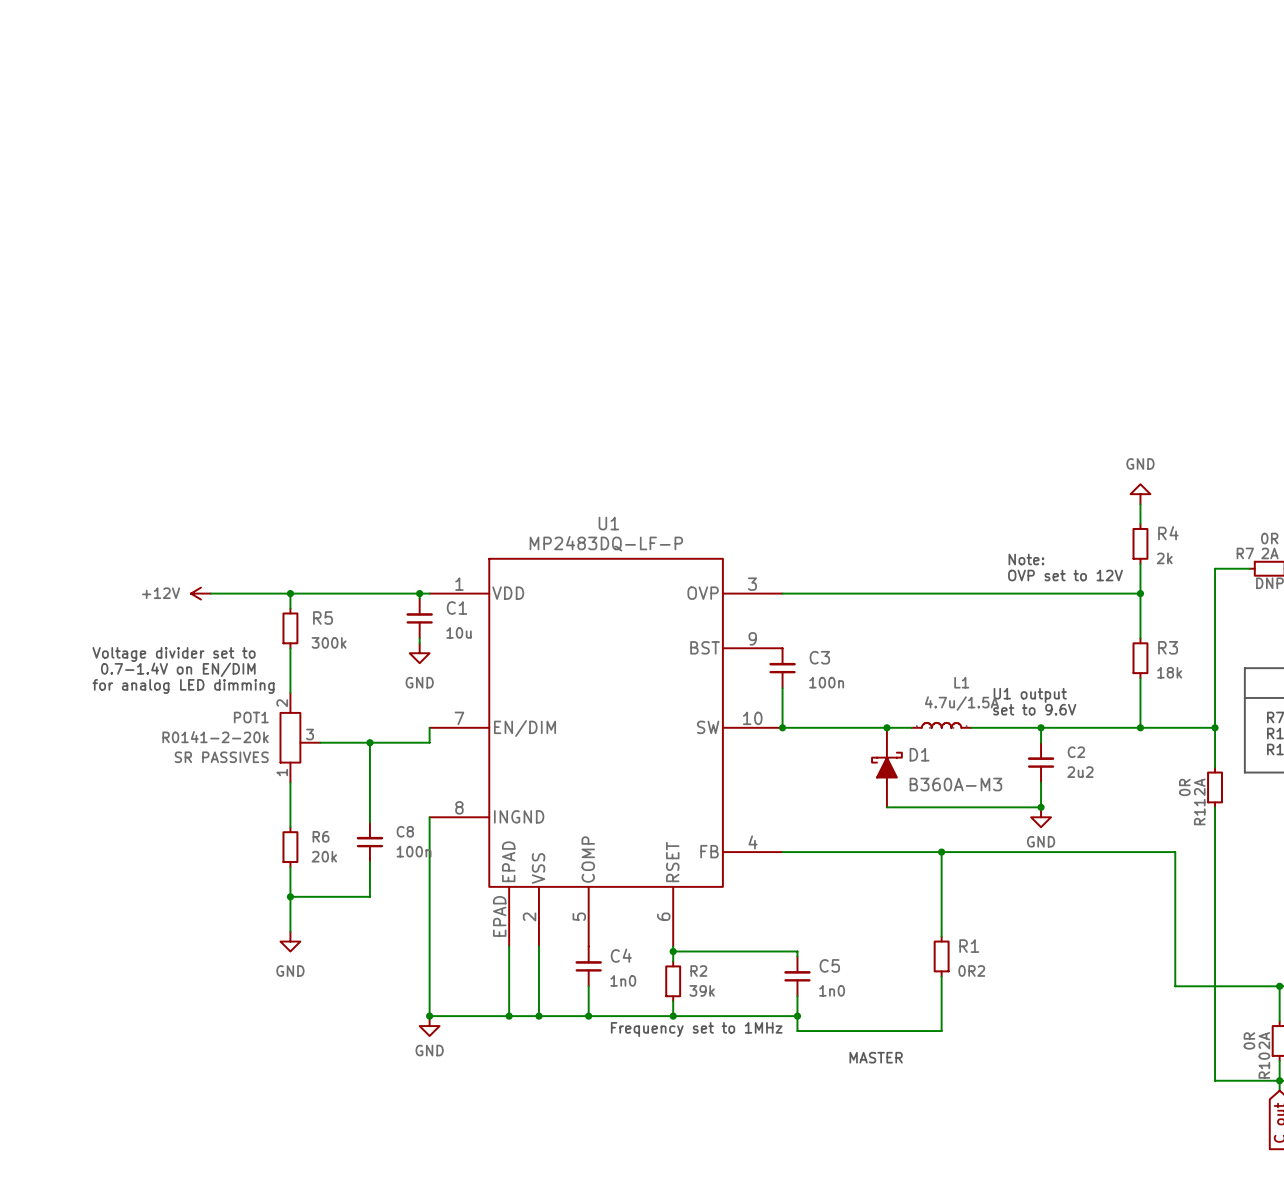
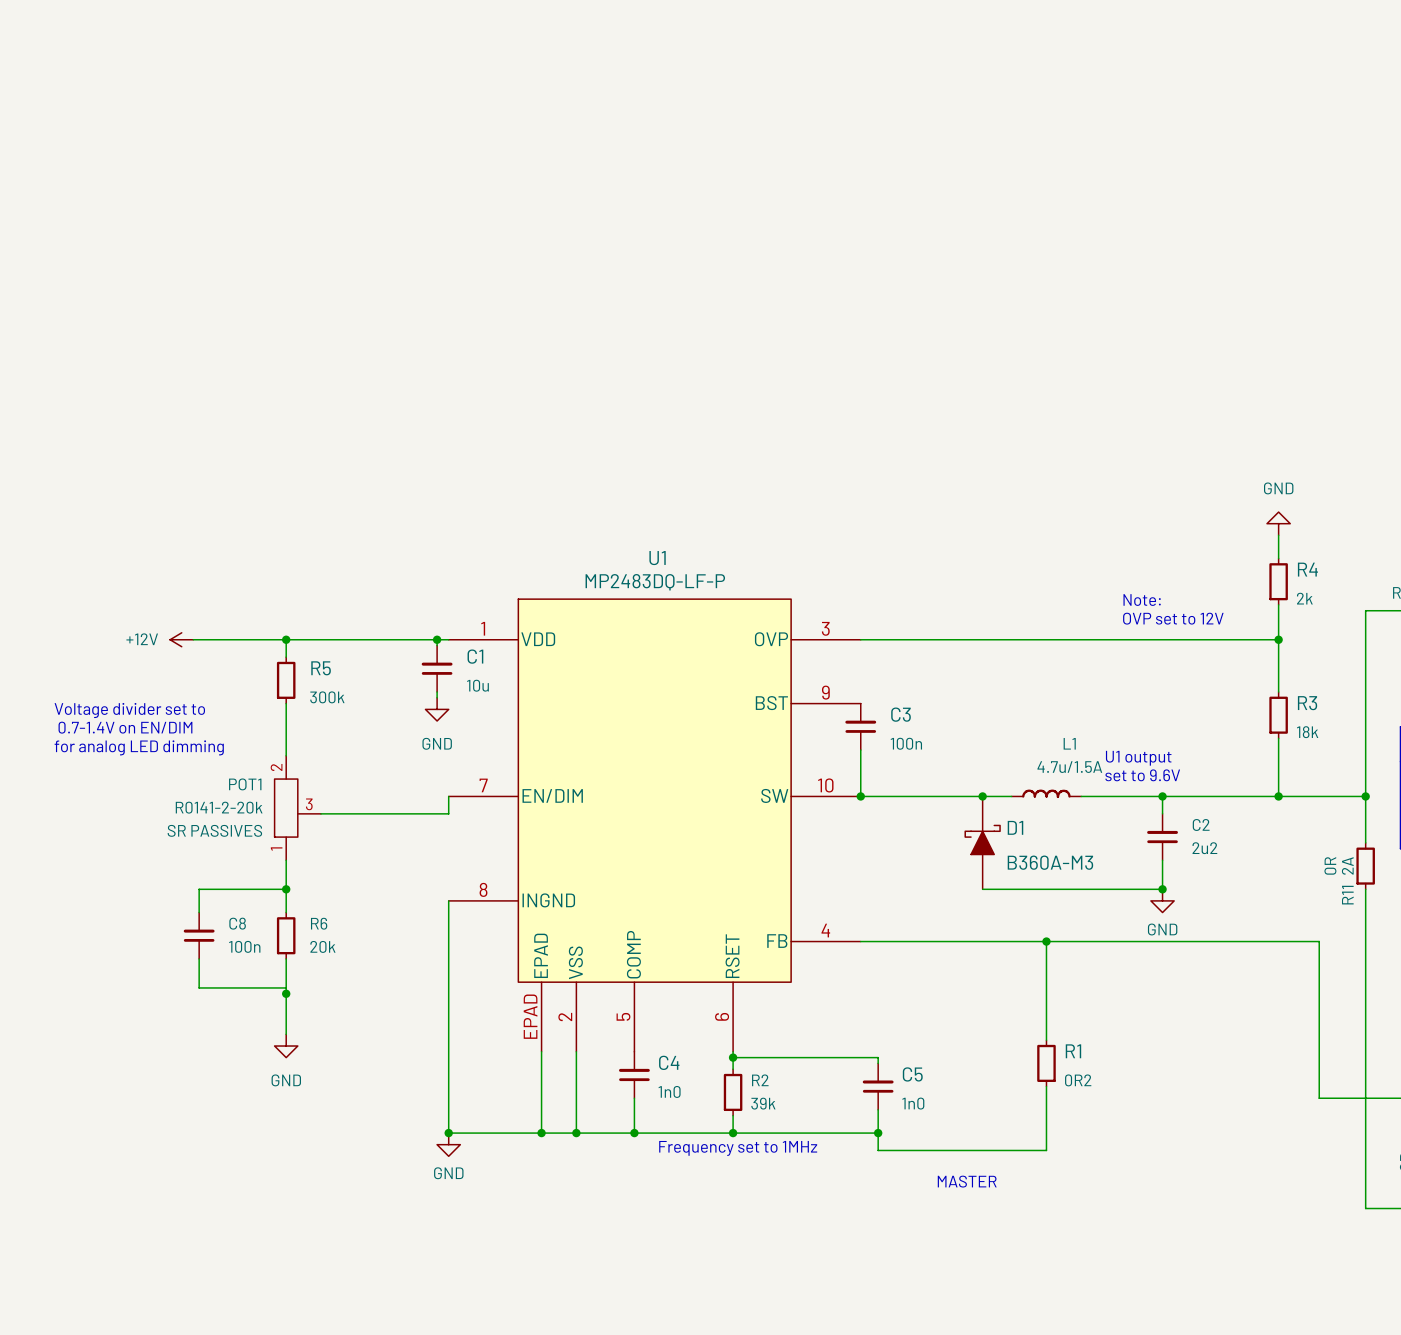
wire: (369, 742) (369, 822) -> none
junction: (369, 742) -> none
wire: none -> (286, 889) (199, 889) (199, 912)
junction: none -> (286, 889)
C8 position: (369, 842) -> (199, 935)
wire: (369, 862) (369, 896) (290, 896) -> none
wire: none -> (199, 958) (199, 987) (286, 987)

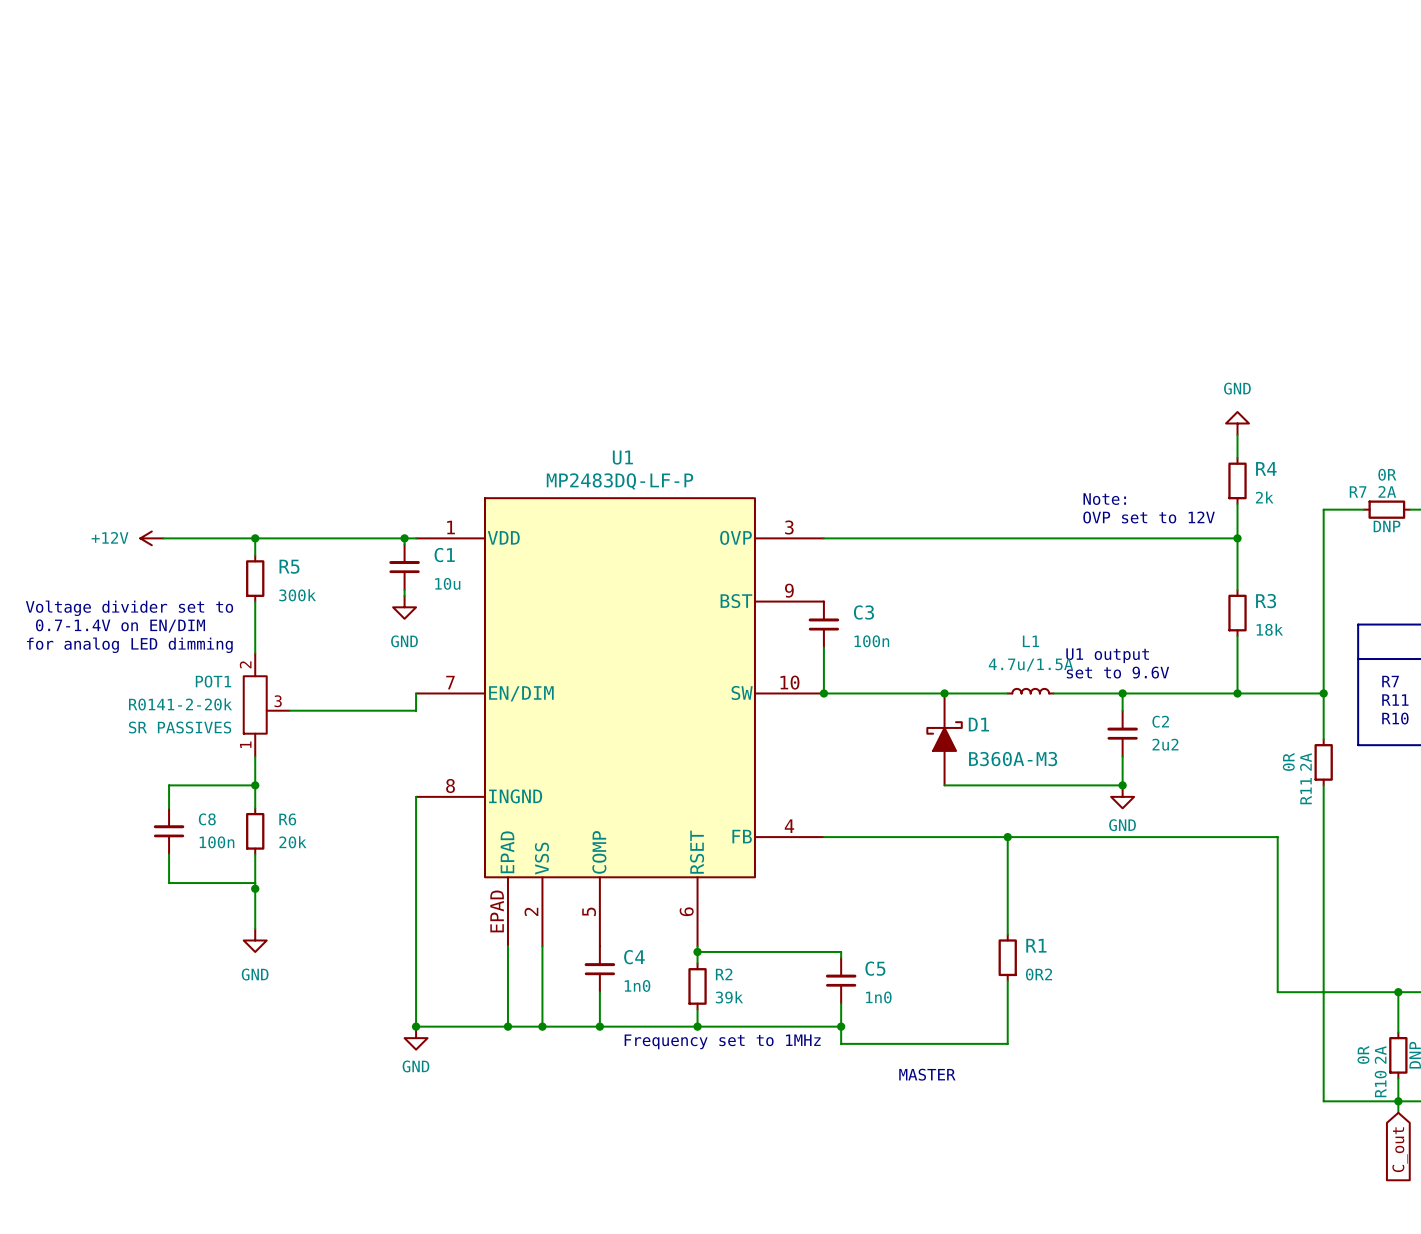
L1 symbol: [1011, 789, 1082, 799] -> [1007, 688, 1054, 694]
wire: none -> (973, 693) (1007, 693)
wire: (1081, 796) (1092, 796) -> none

